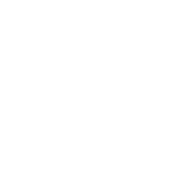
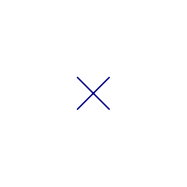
no-connect mark: none -> (93, 93)

